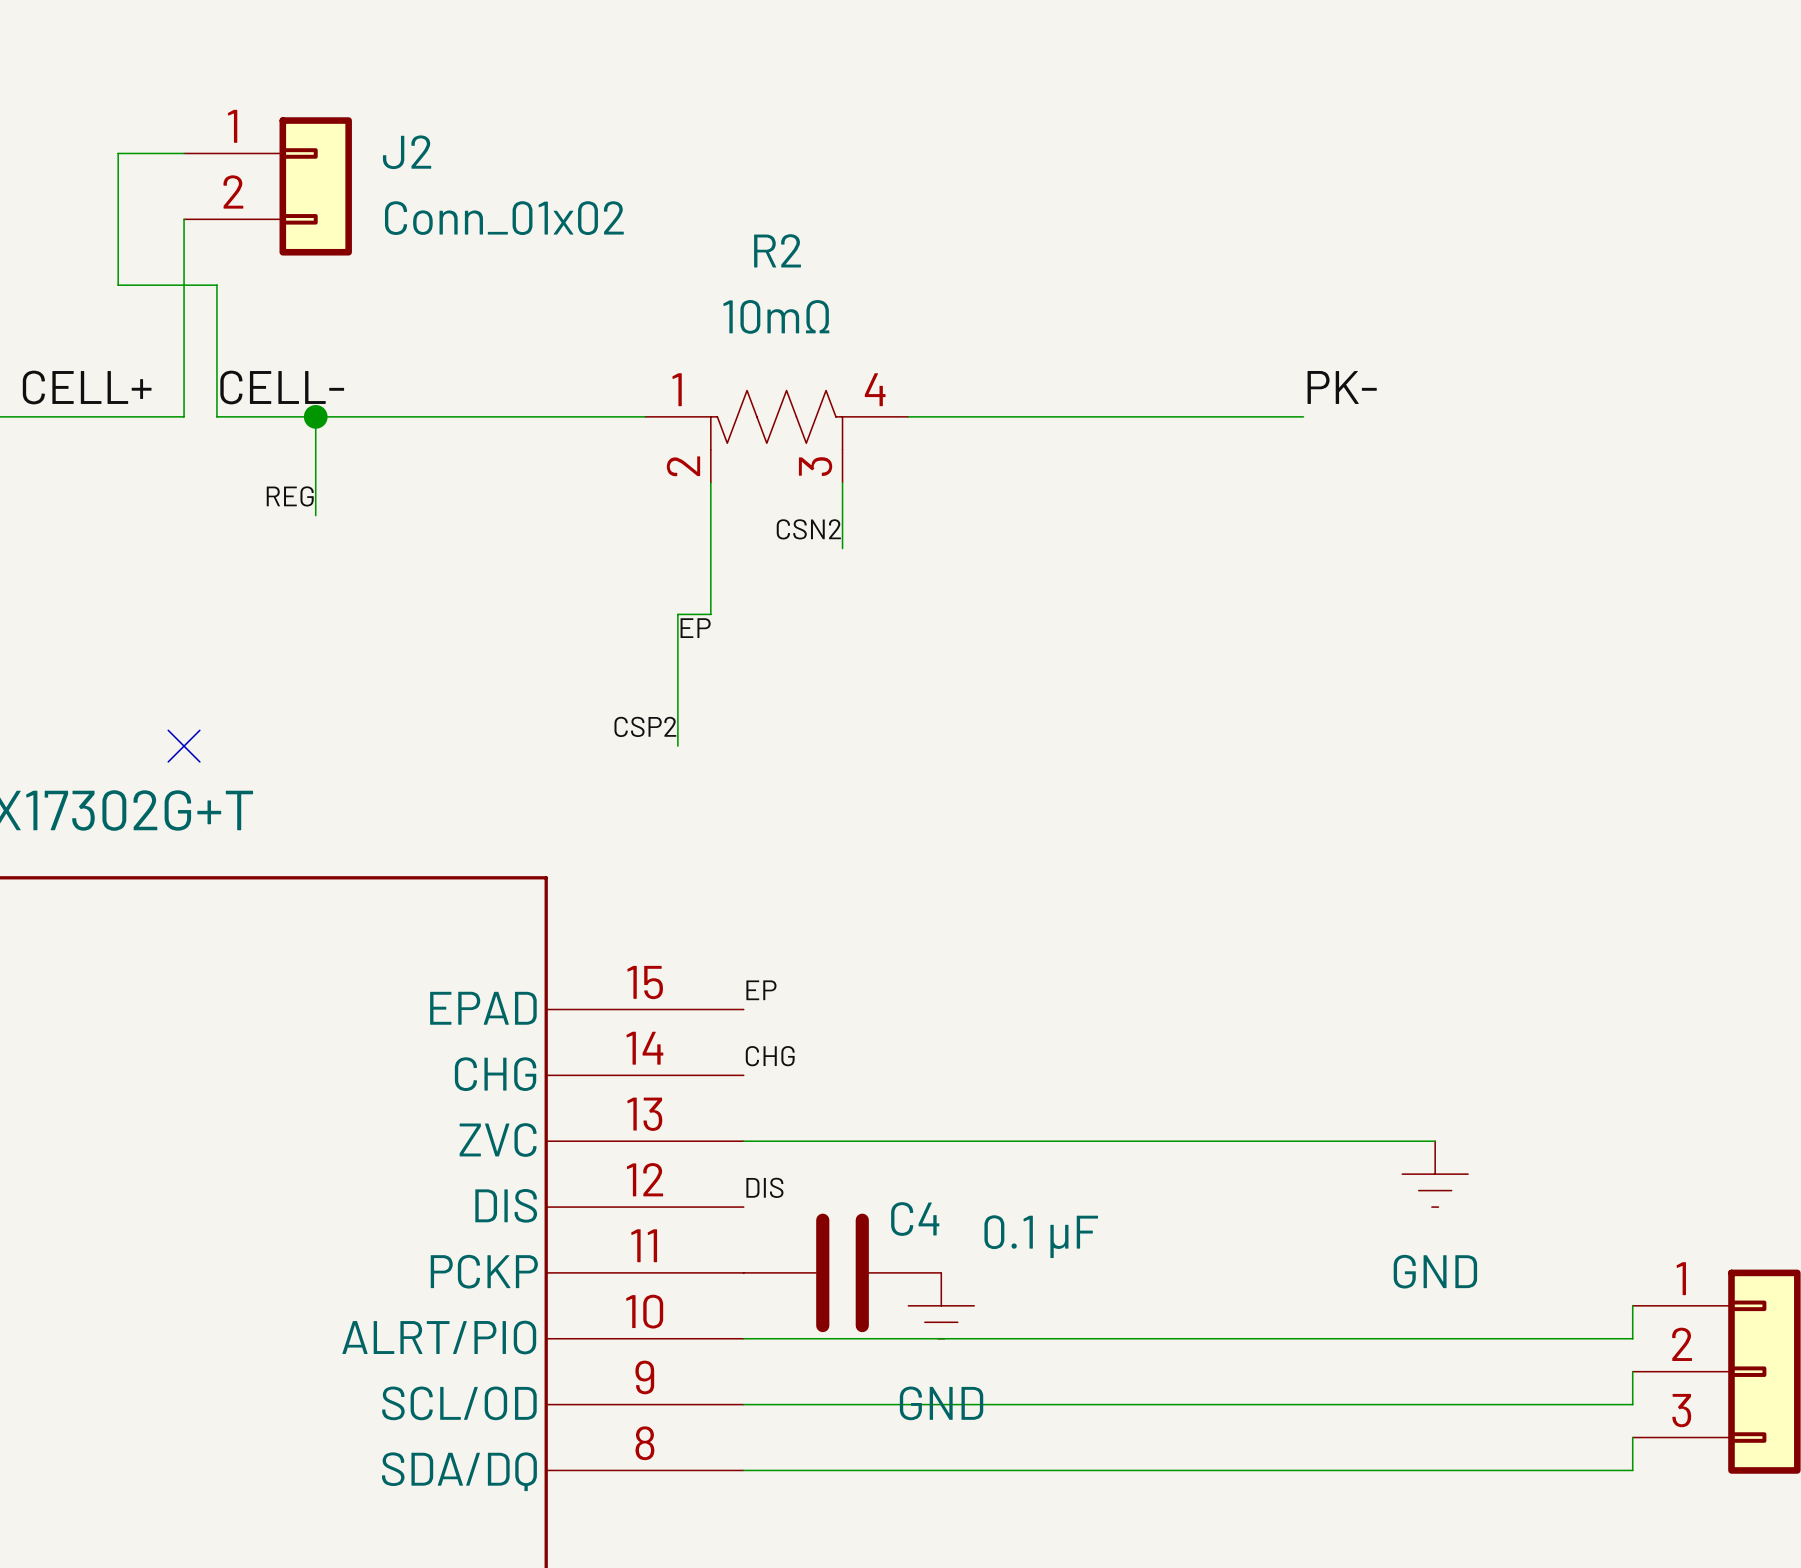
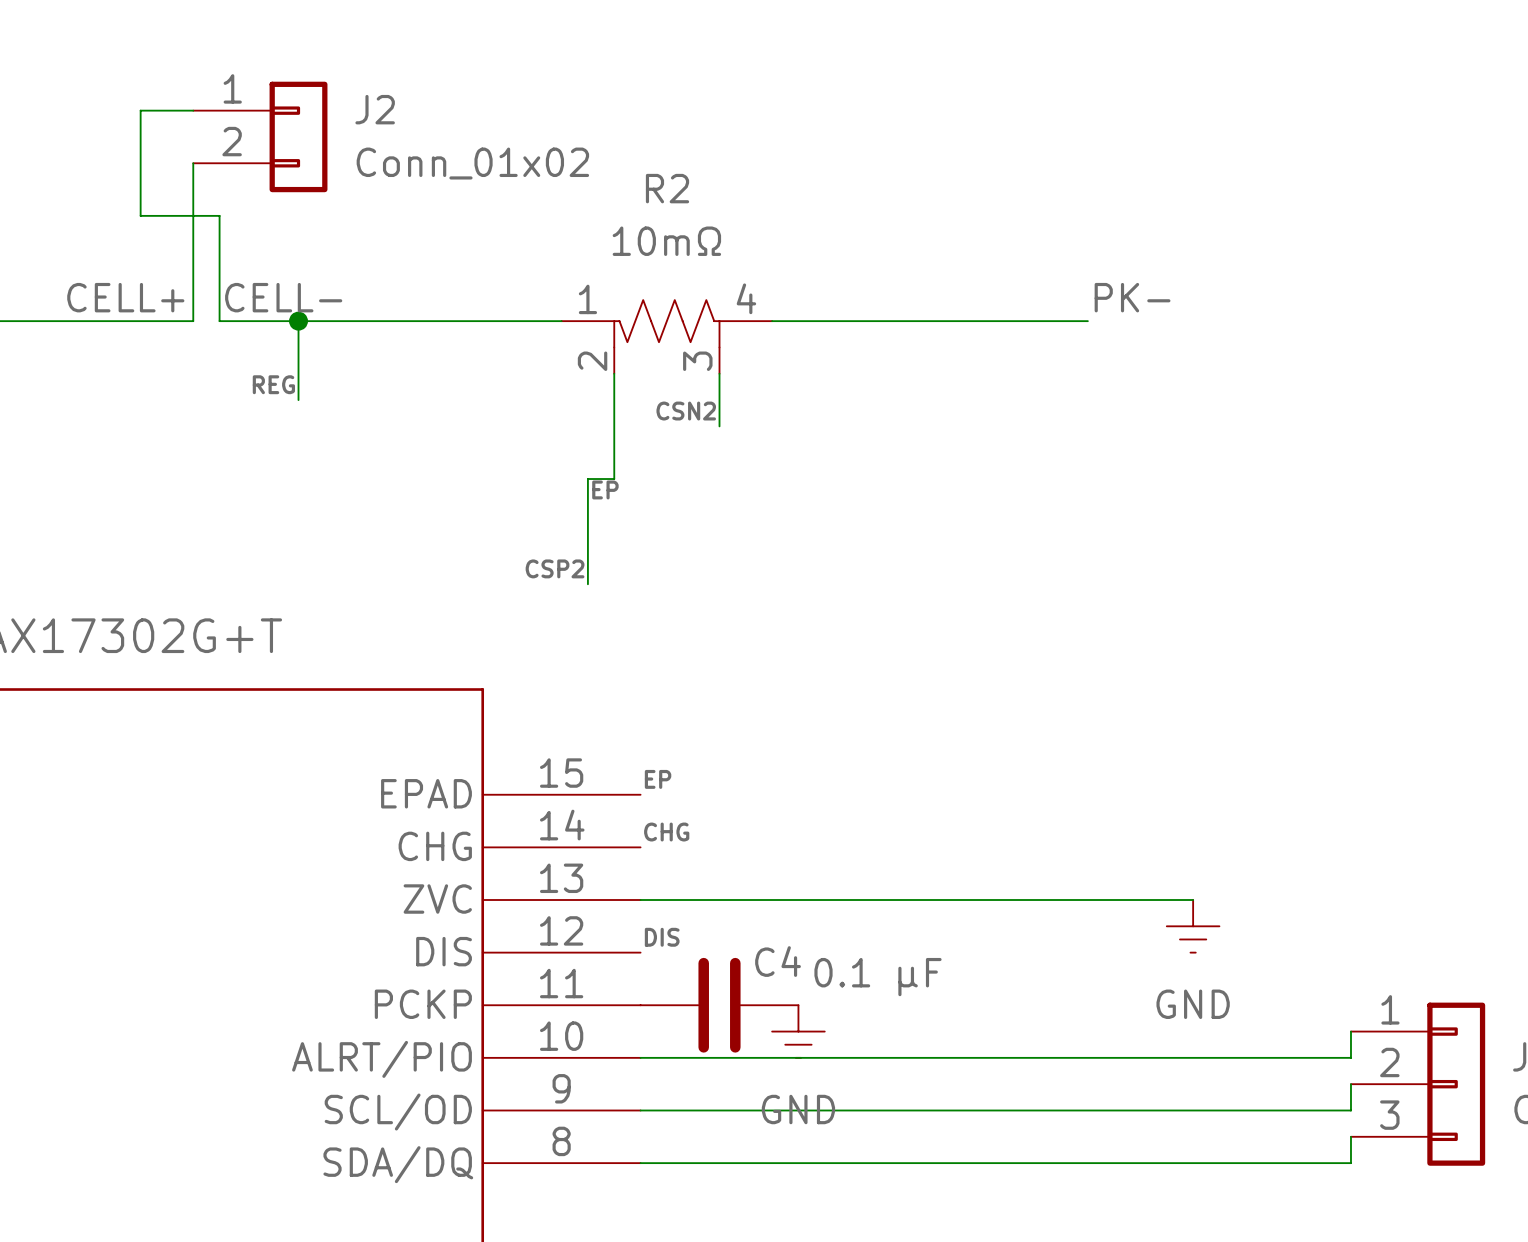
no-connect mark: (184, 746) -> none

